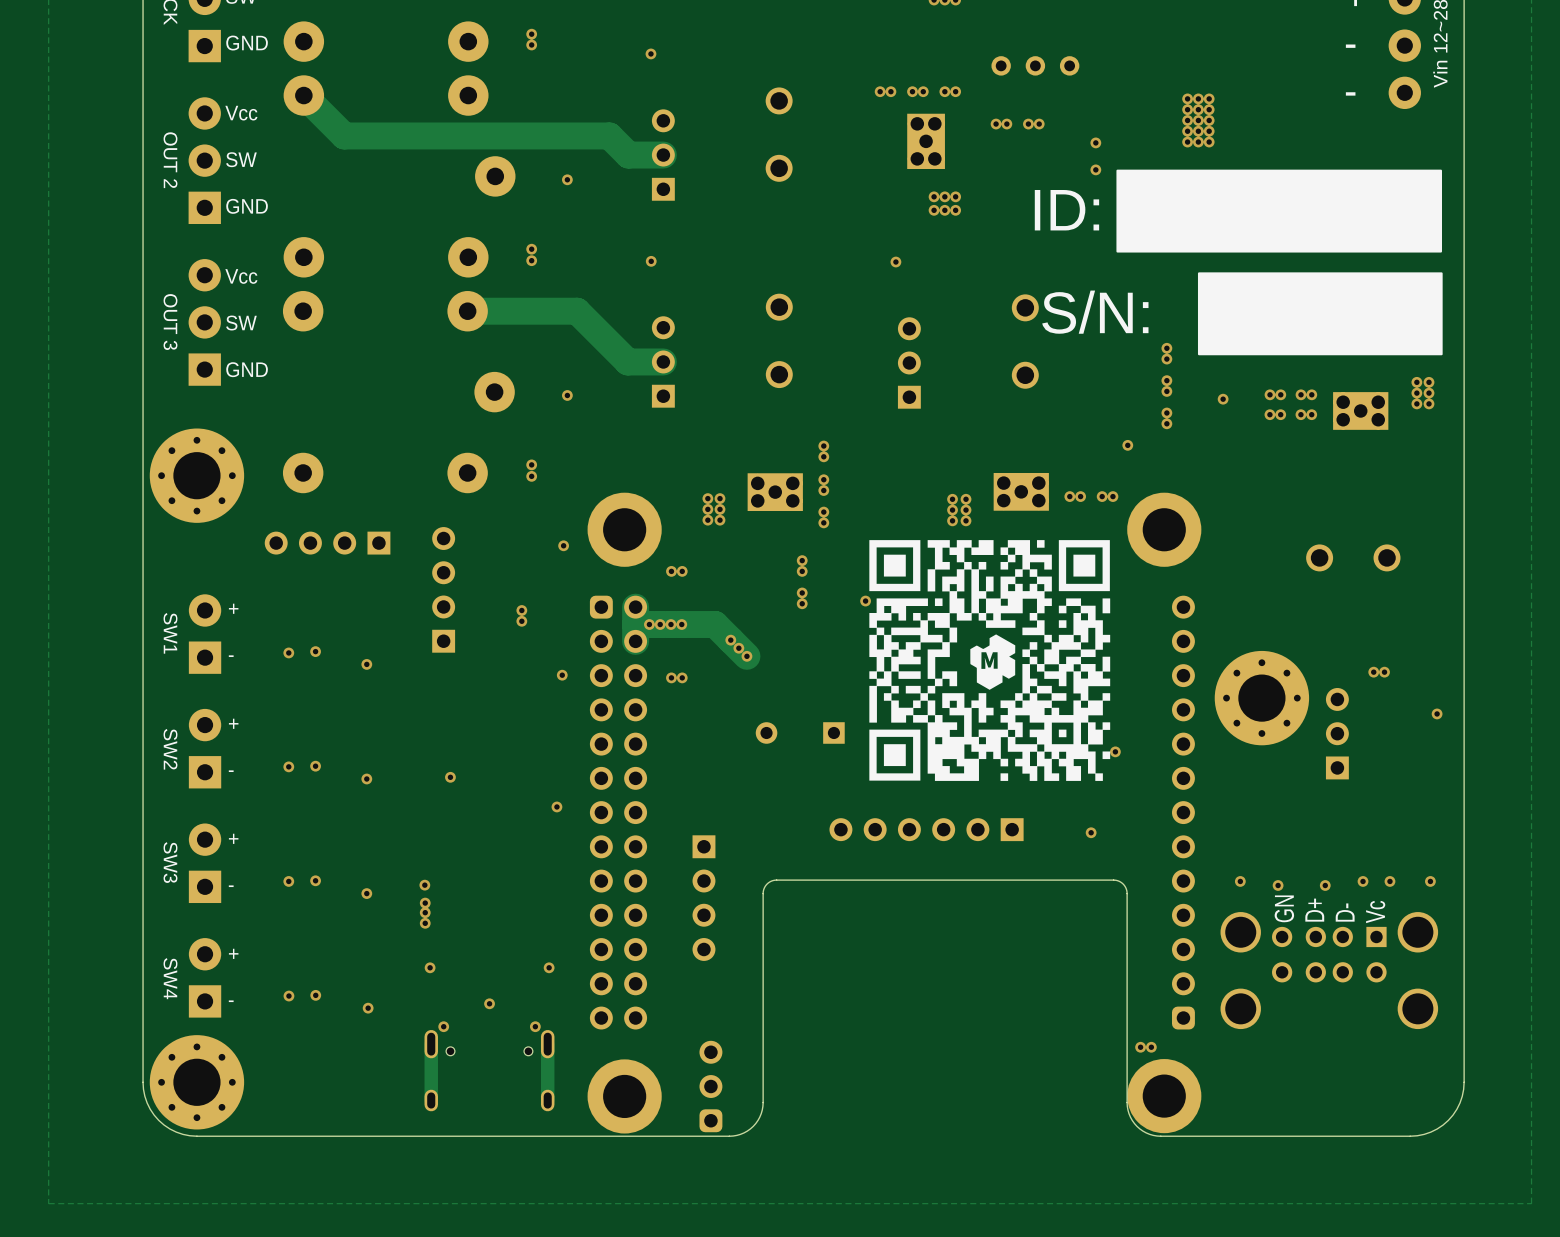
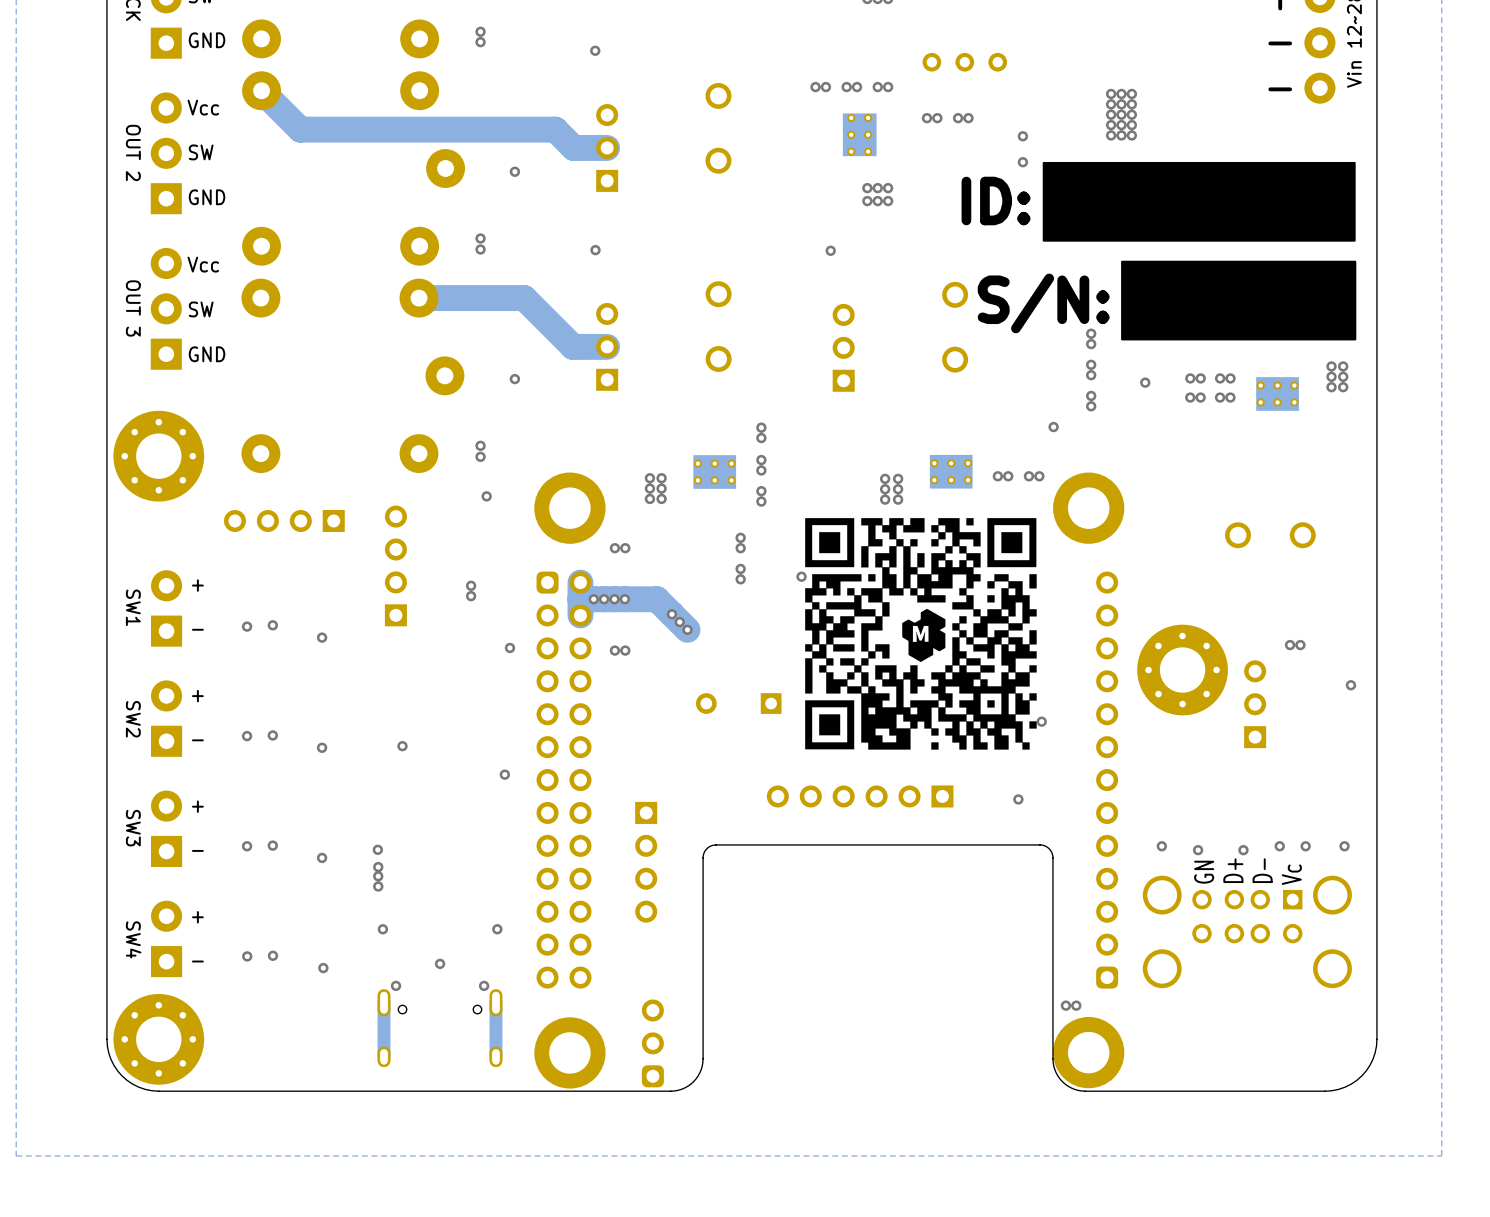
part footprint: [907, 113, 945, 170] -> [842, 113, 877, 157]
part footprint: [1333, 392, 1389, 430] -> [1256, 377, 1299, 411]
part footprint: [993, 472, 1049, 511] -> [929, 454, 973, 489]
part footprint: [747, 473, 803, 512] -> [693, 455, 737, 489]
via position: (563, 545) -> (486, 496)

